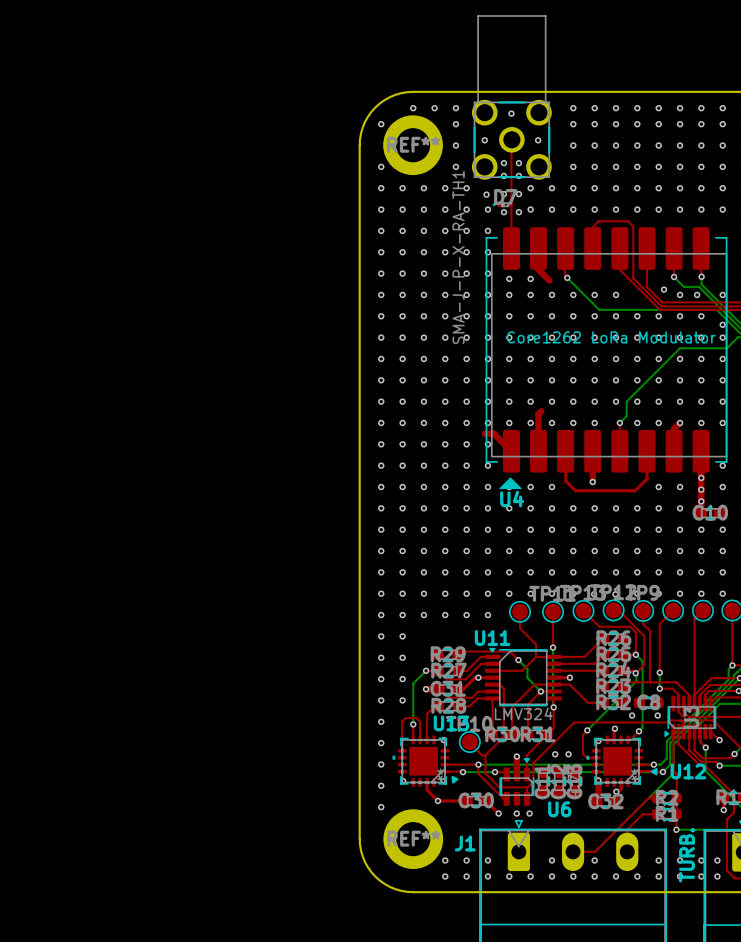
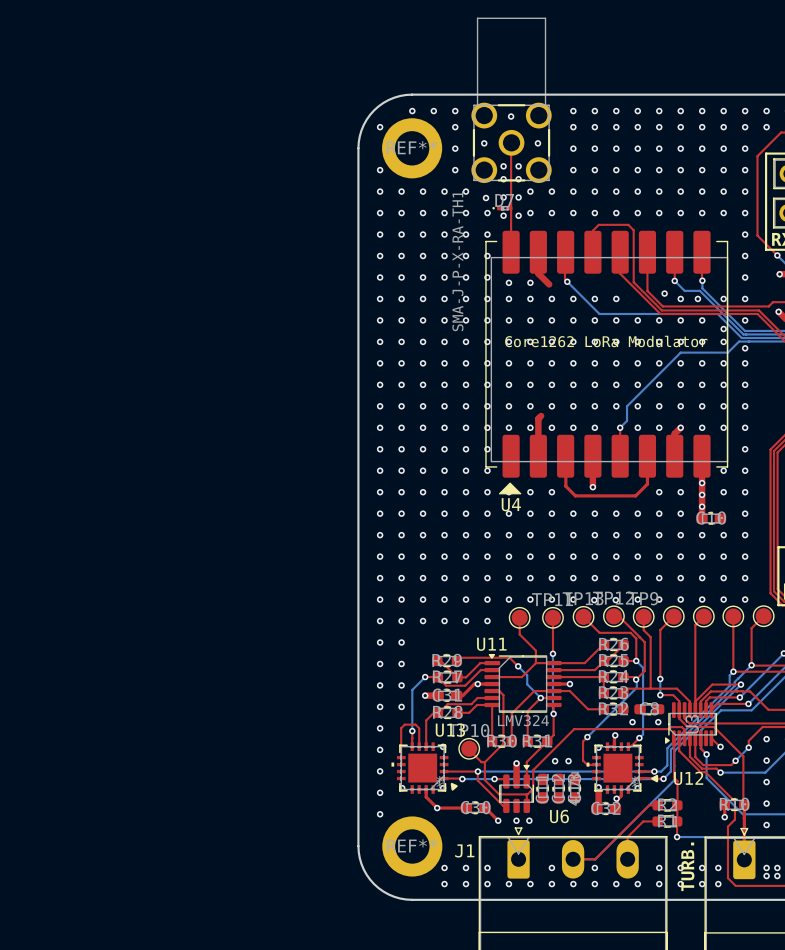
top track: (484, 433) (493, 433) (511, 451) -> none

